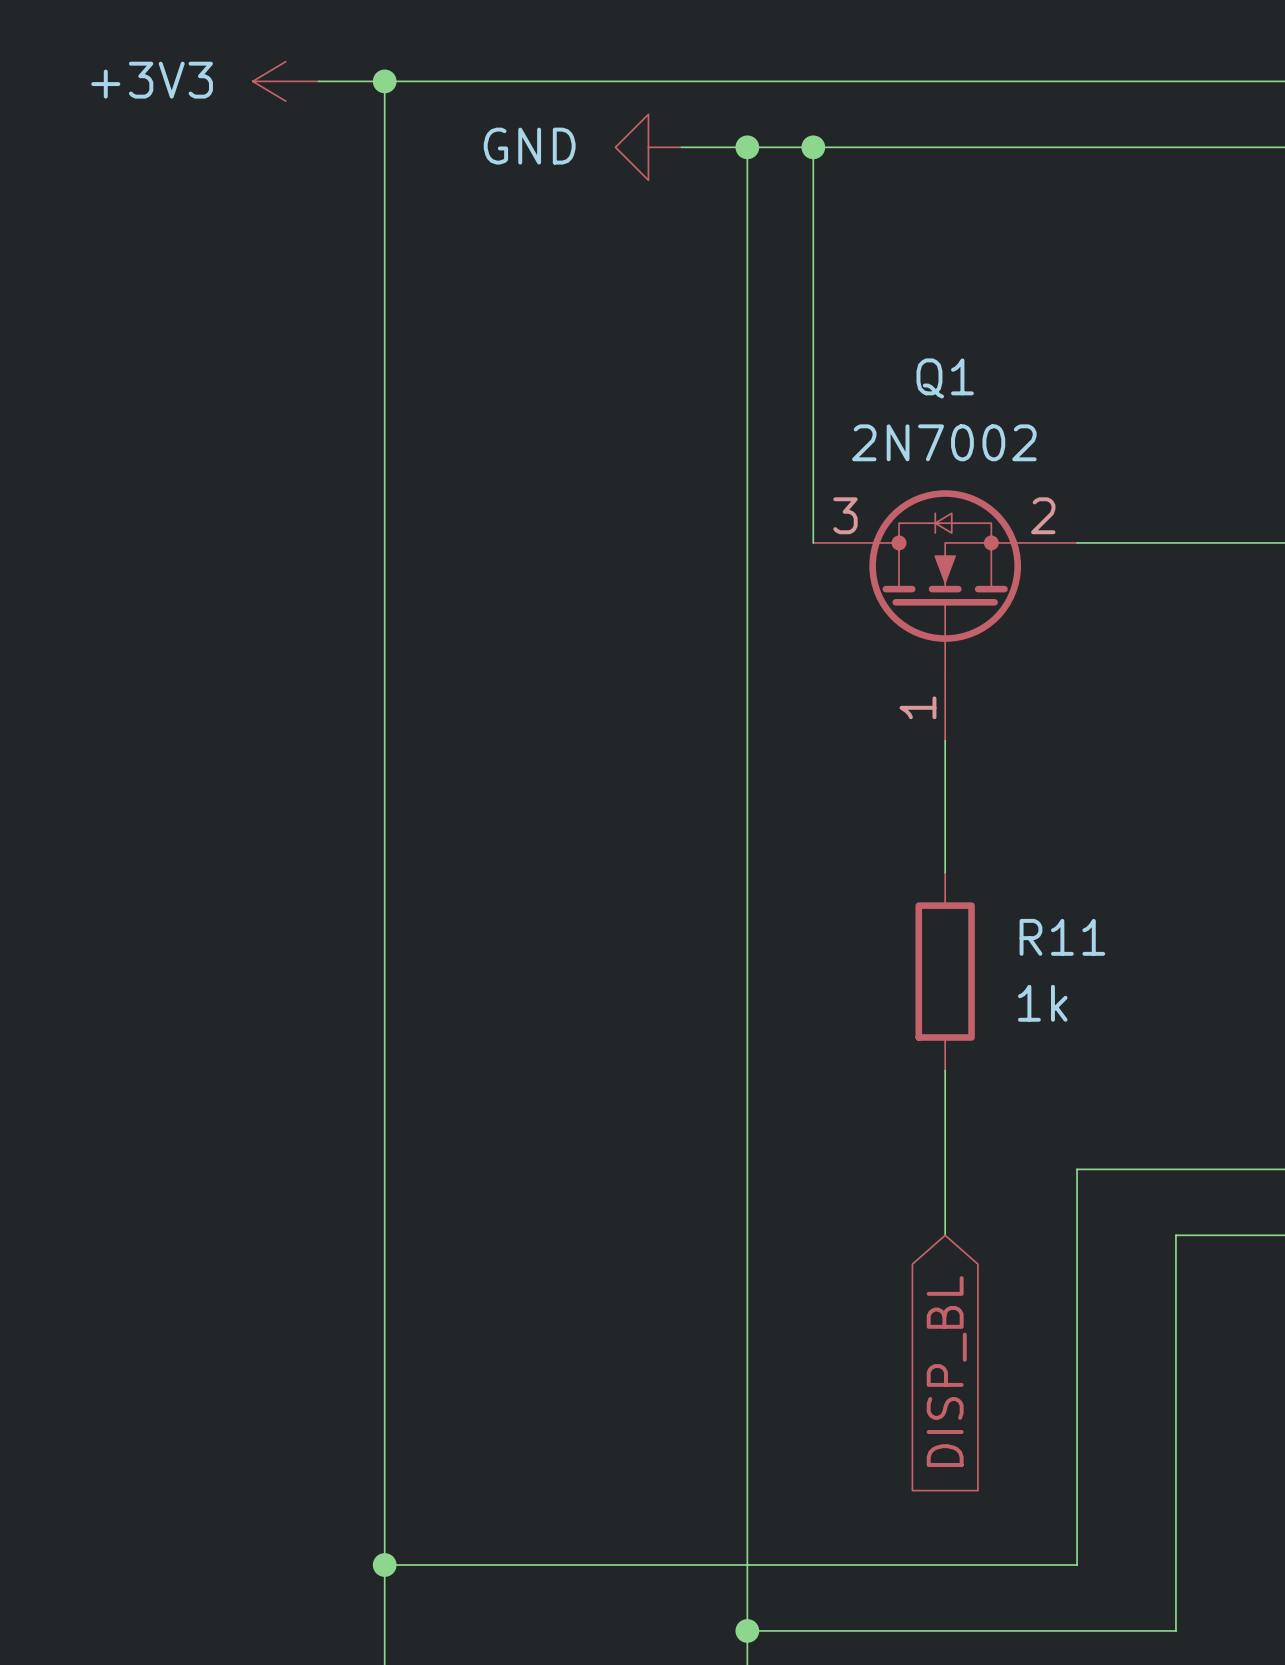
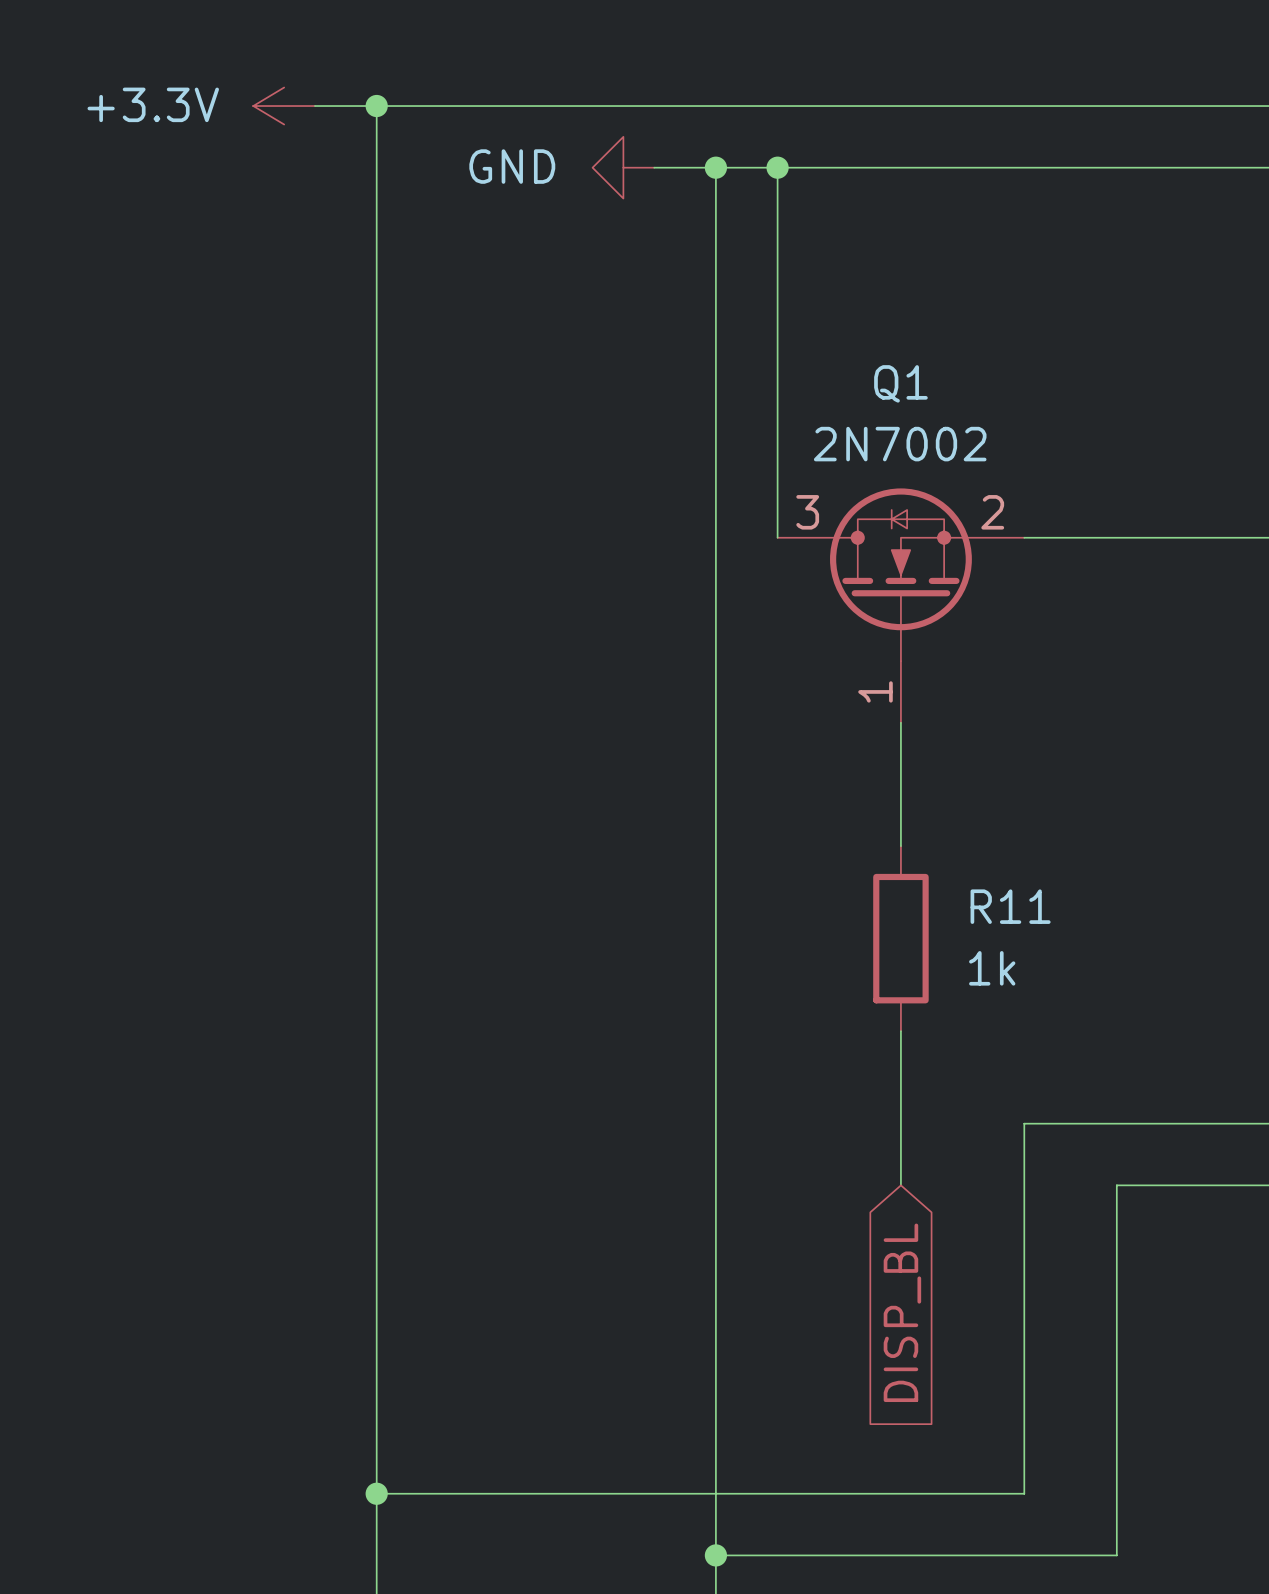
power symbol: +3V3 (285, 81) -> +3.3V (284, 106)

